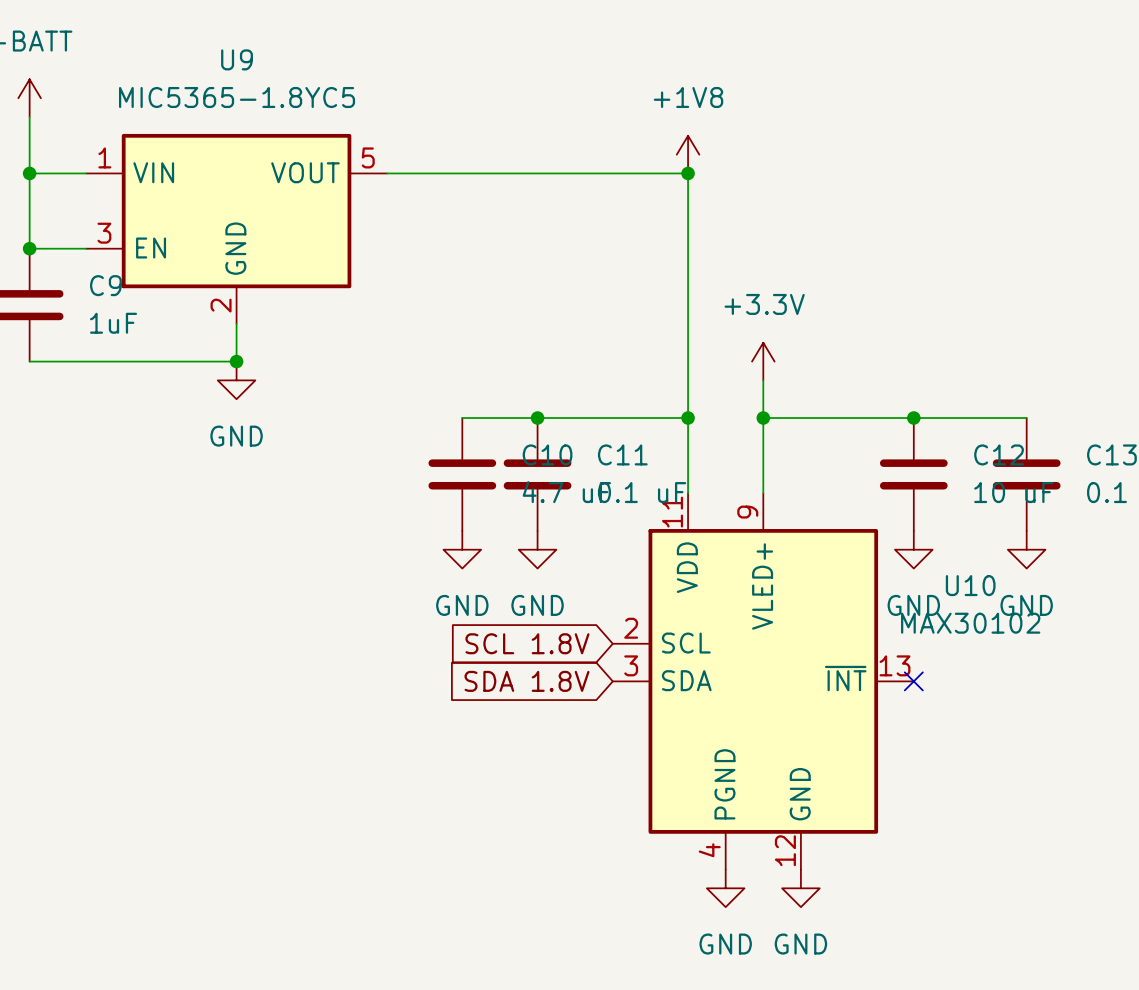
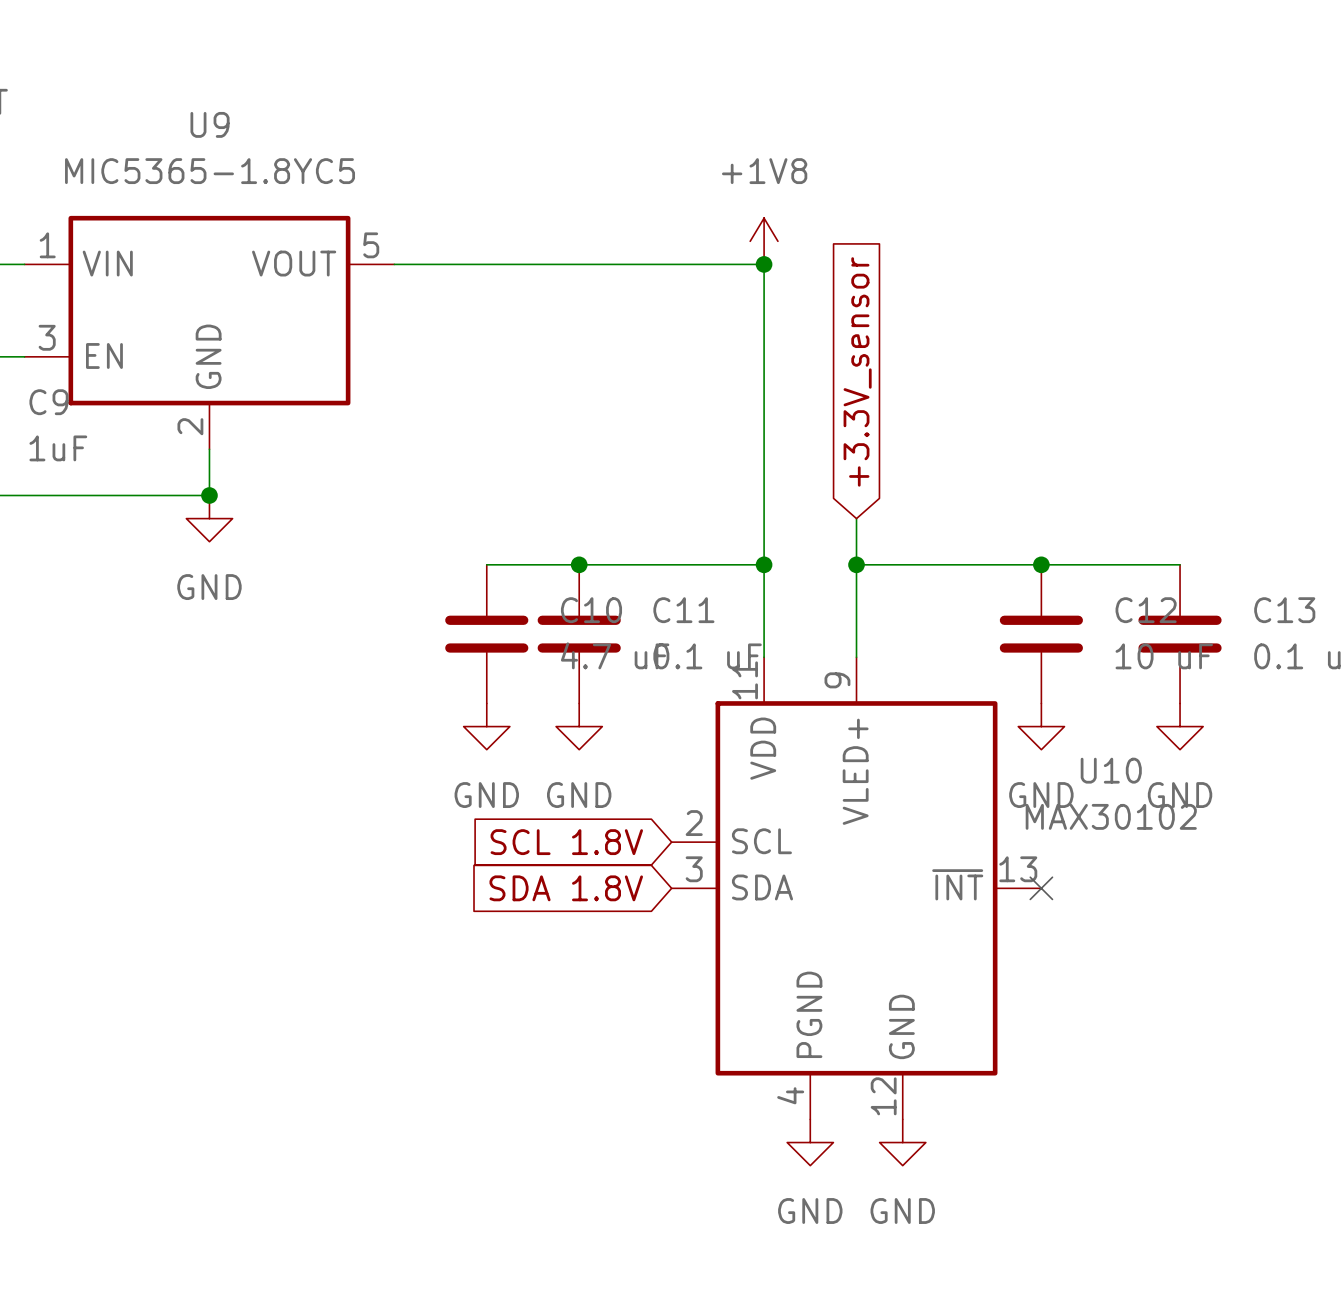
global label: none -> +3.3V_sensor (857, 371)
power symbol: +3.3V (763, 361) -> none

